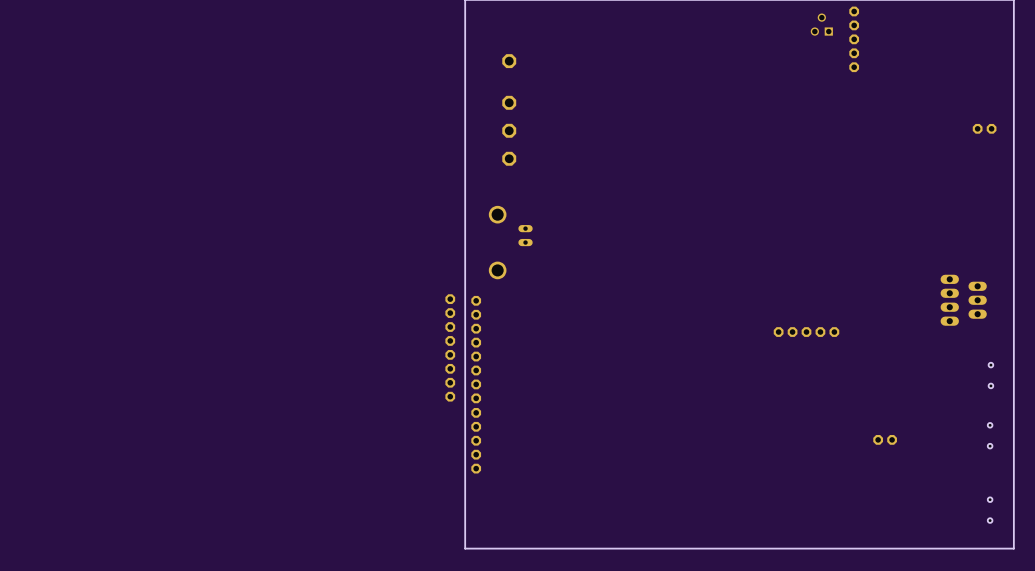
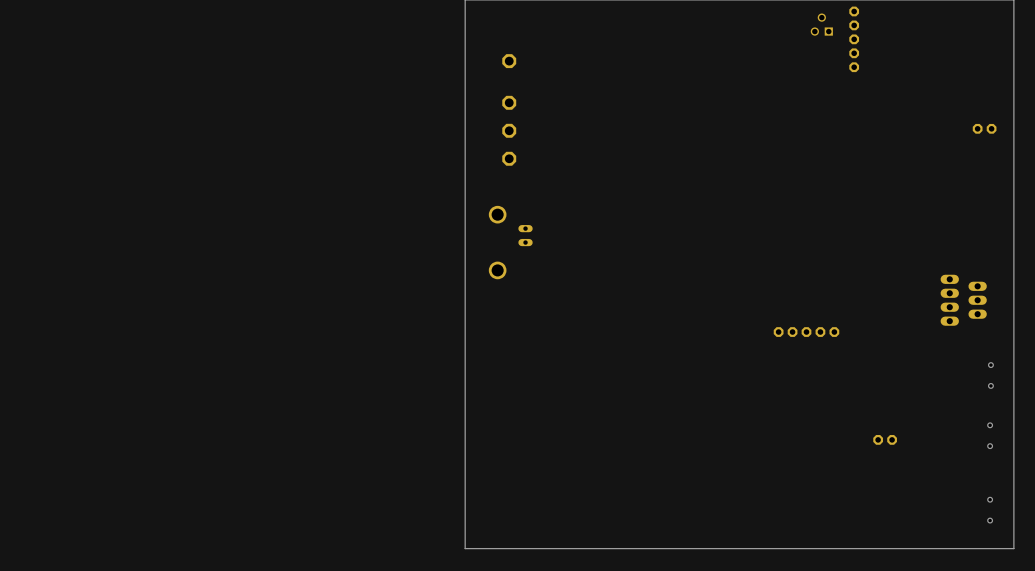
part: (450, 347) -> none
part: (476, 349) -> none
part: (476, 440) -> none

